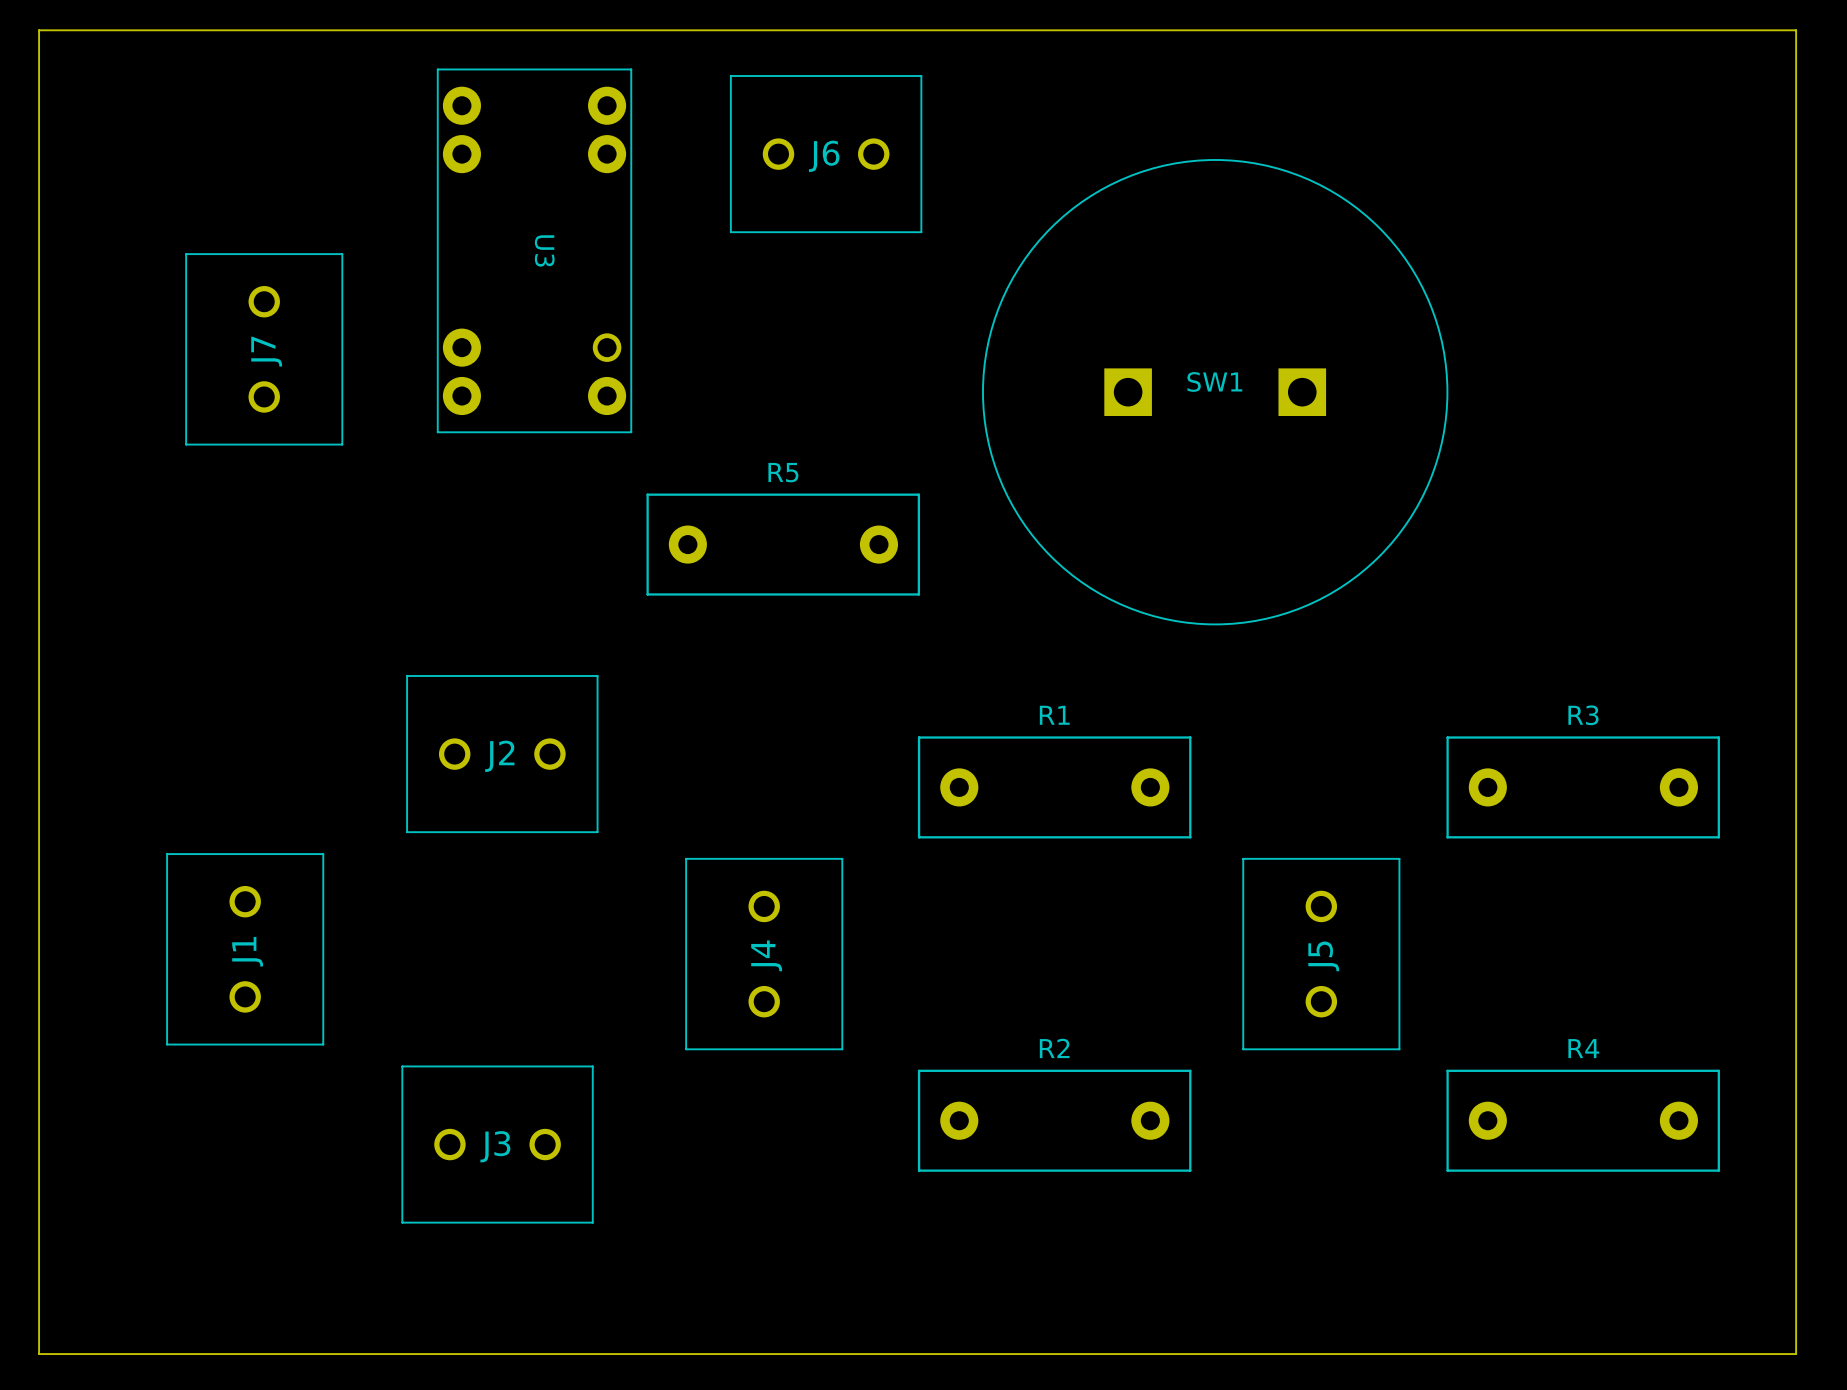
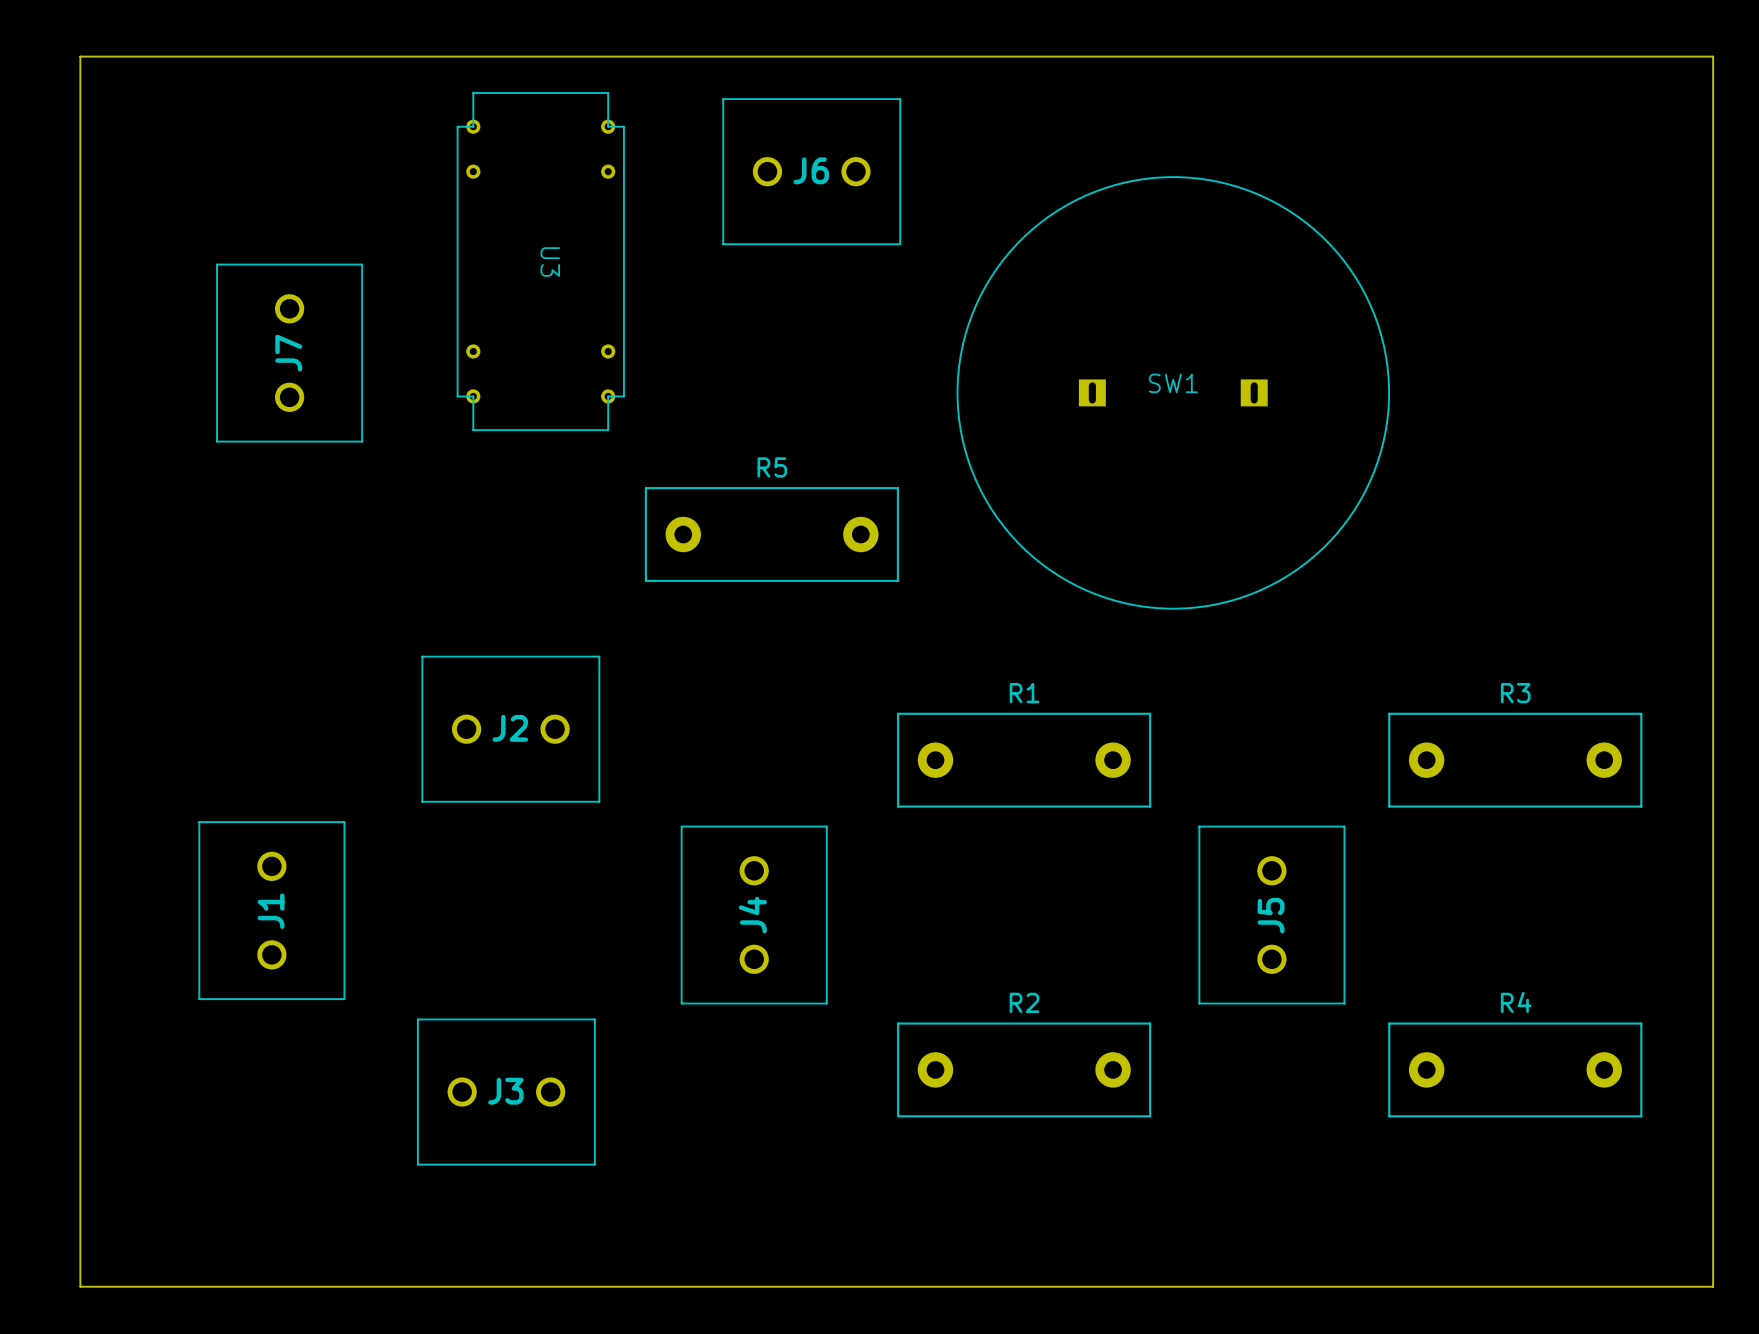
U3 footprint: [436, 68, 633, 434] -> [456, 92, 625, 432]
SW1 footprint: [982, 159, 1449, 626] -> [956, 176, 1390, 610]

